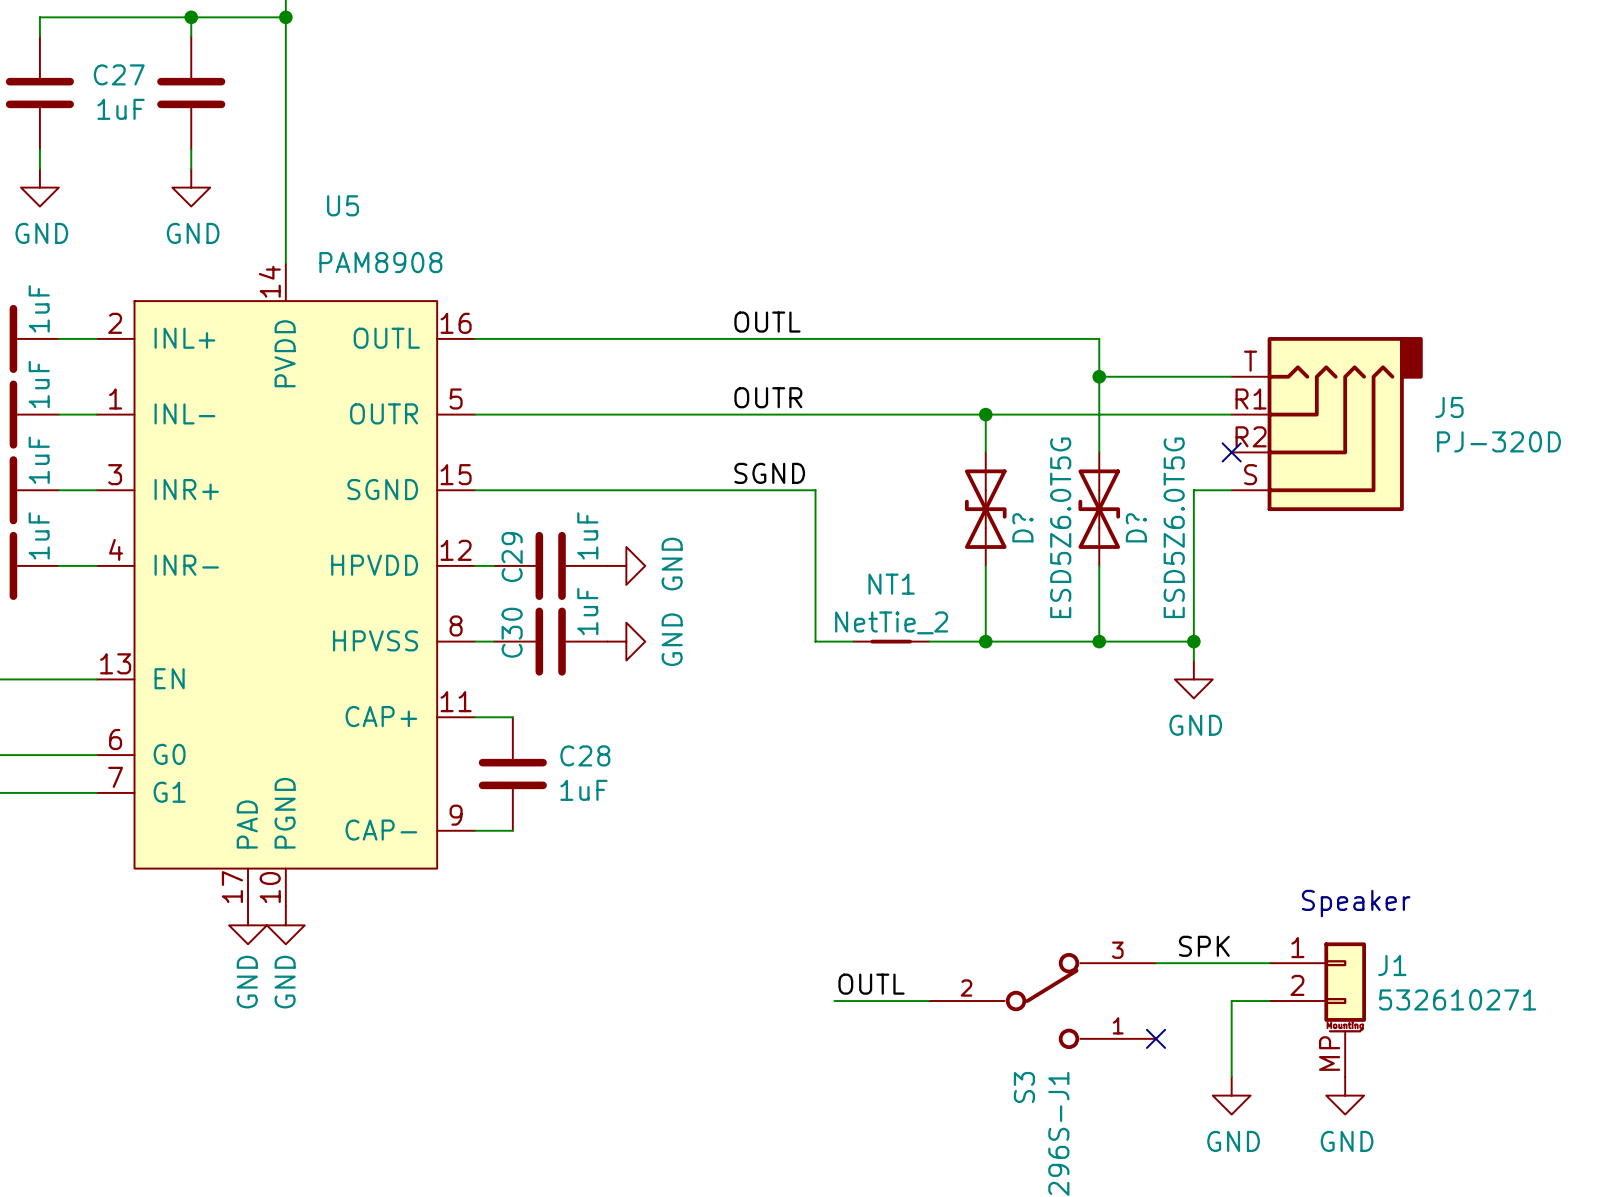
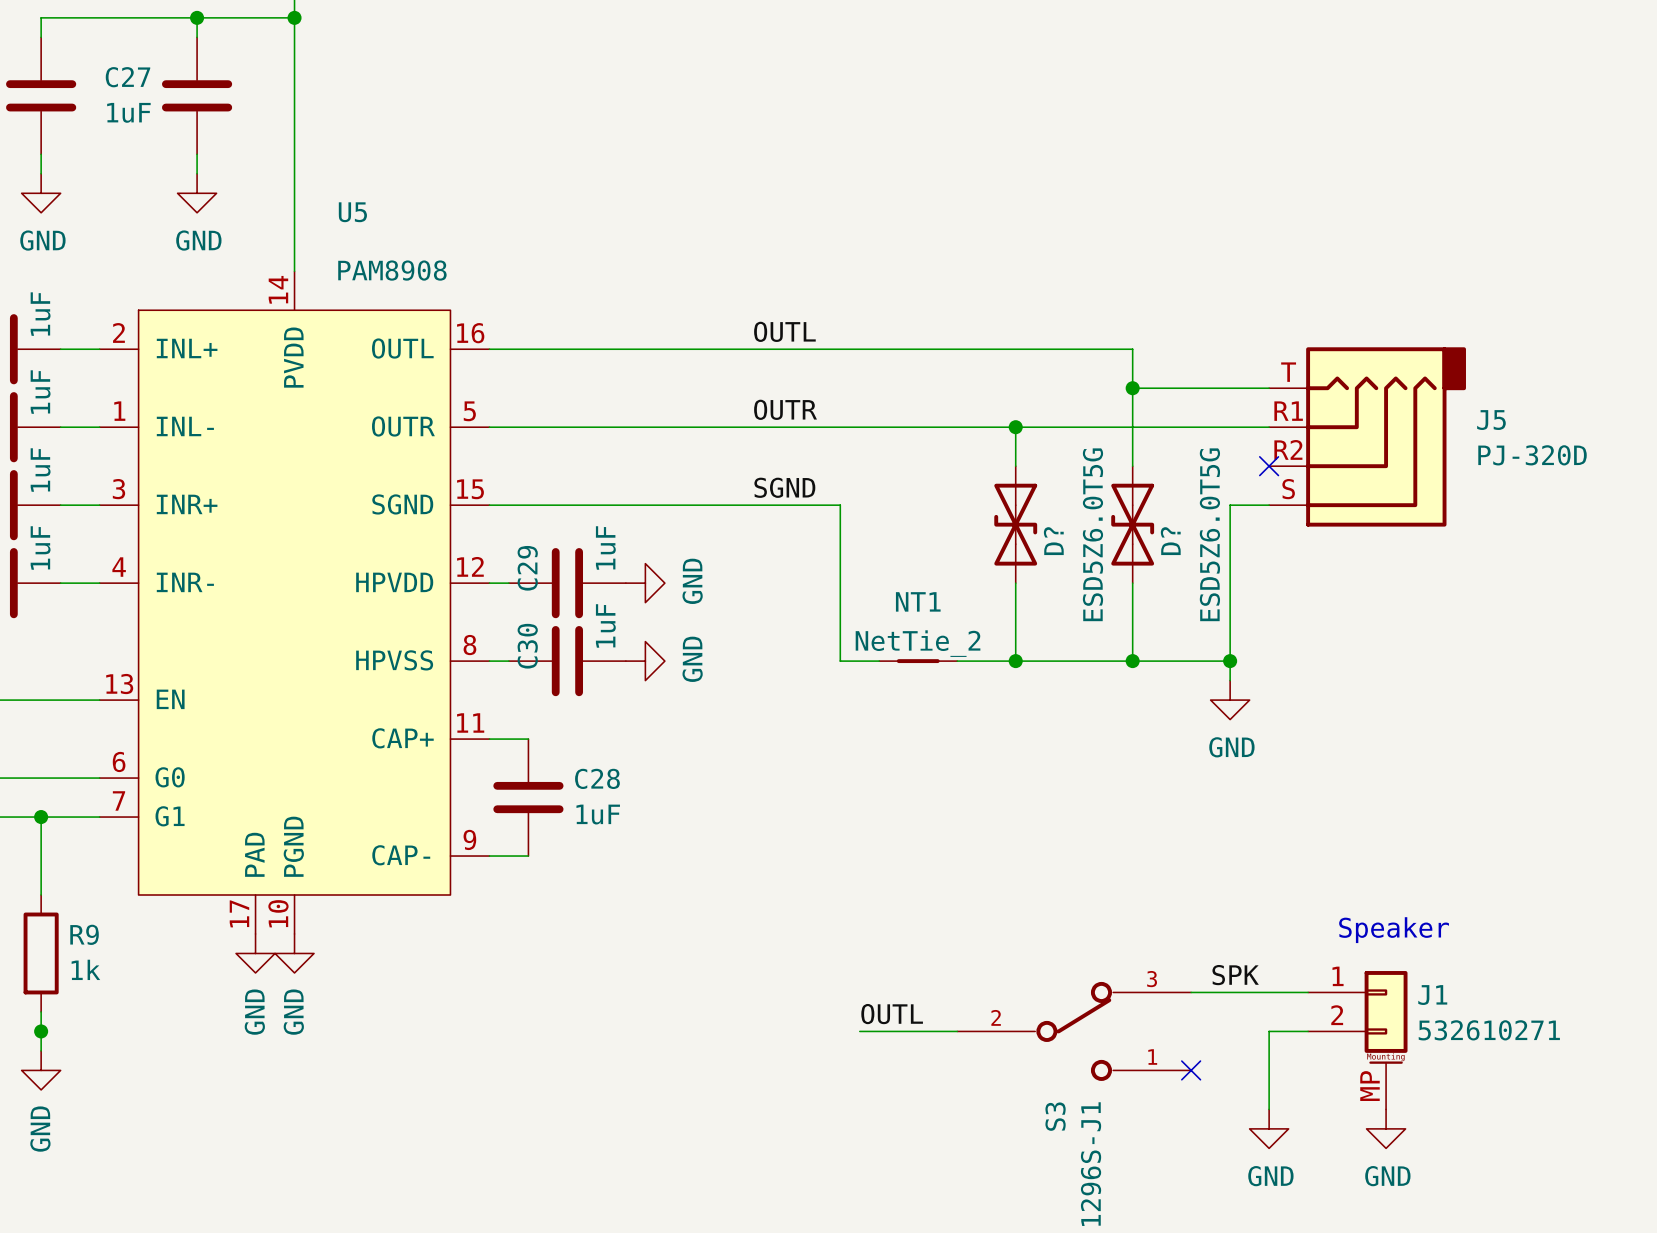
wire: none -> (41, 817) (41, 895)
junction: none -> (41, 817)
R9: none -> 1k (41, 953)
wire: none -> (41, 1011) (41, 1050)
junction: none -> (41, 1031)
power symbol: none -> GND (41, 1070)

